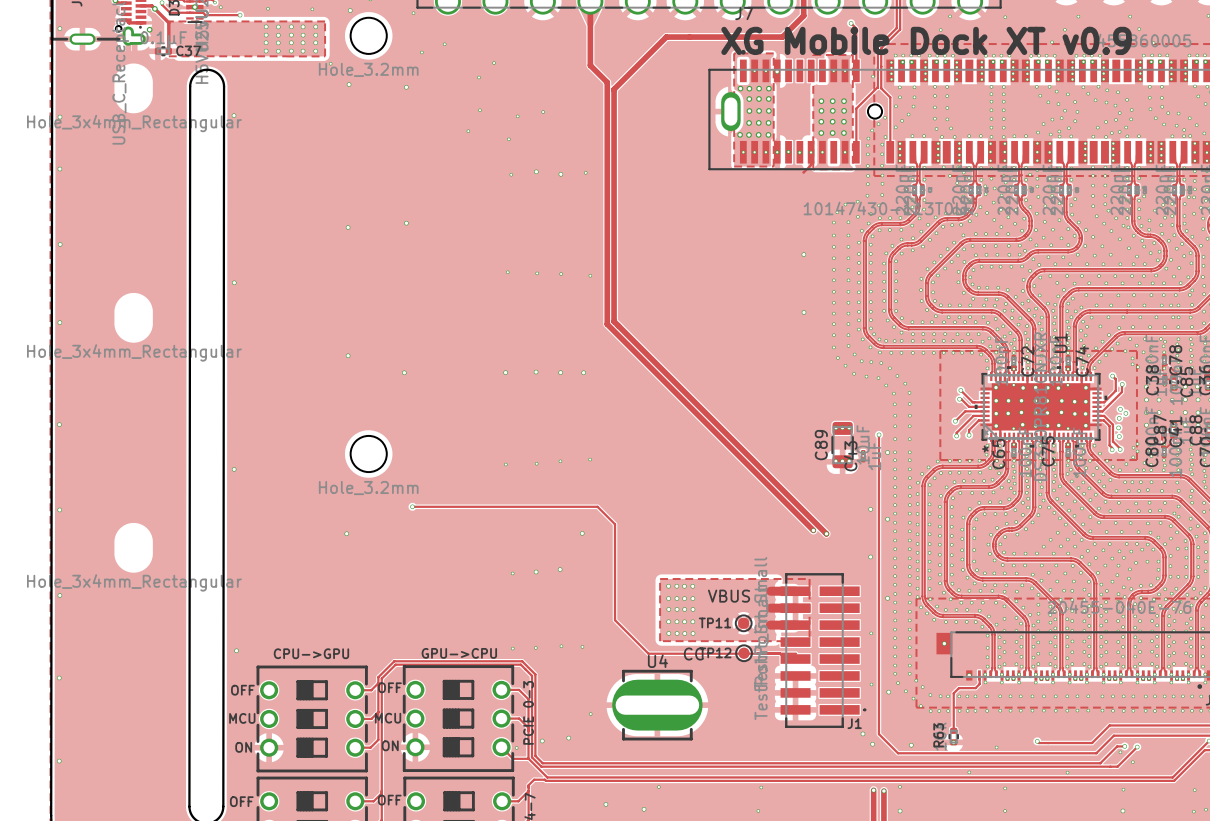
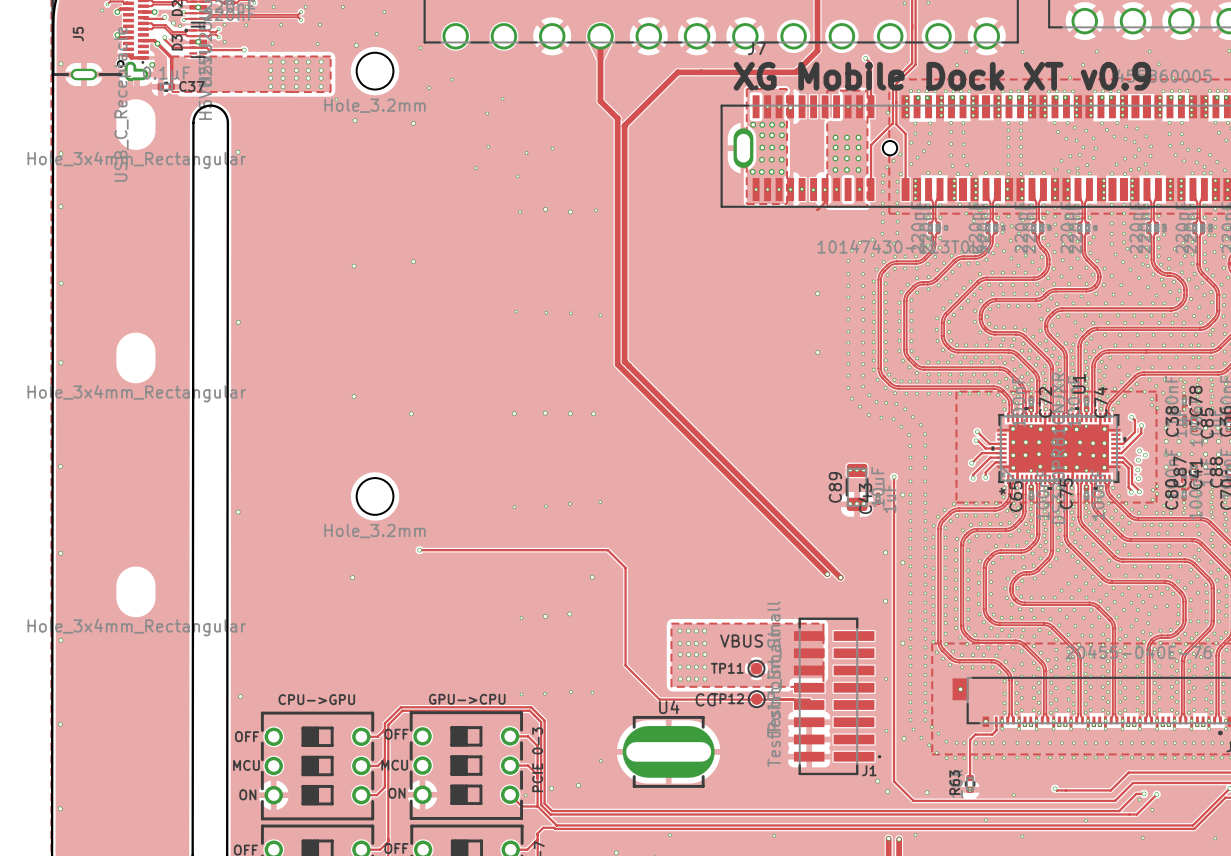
track: (770, 591) (795, 591) -> none
track: (770, 608) (795, 608) -> none
track: (770, 625) (795, 625) -> none

